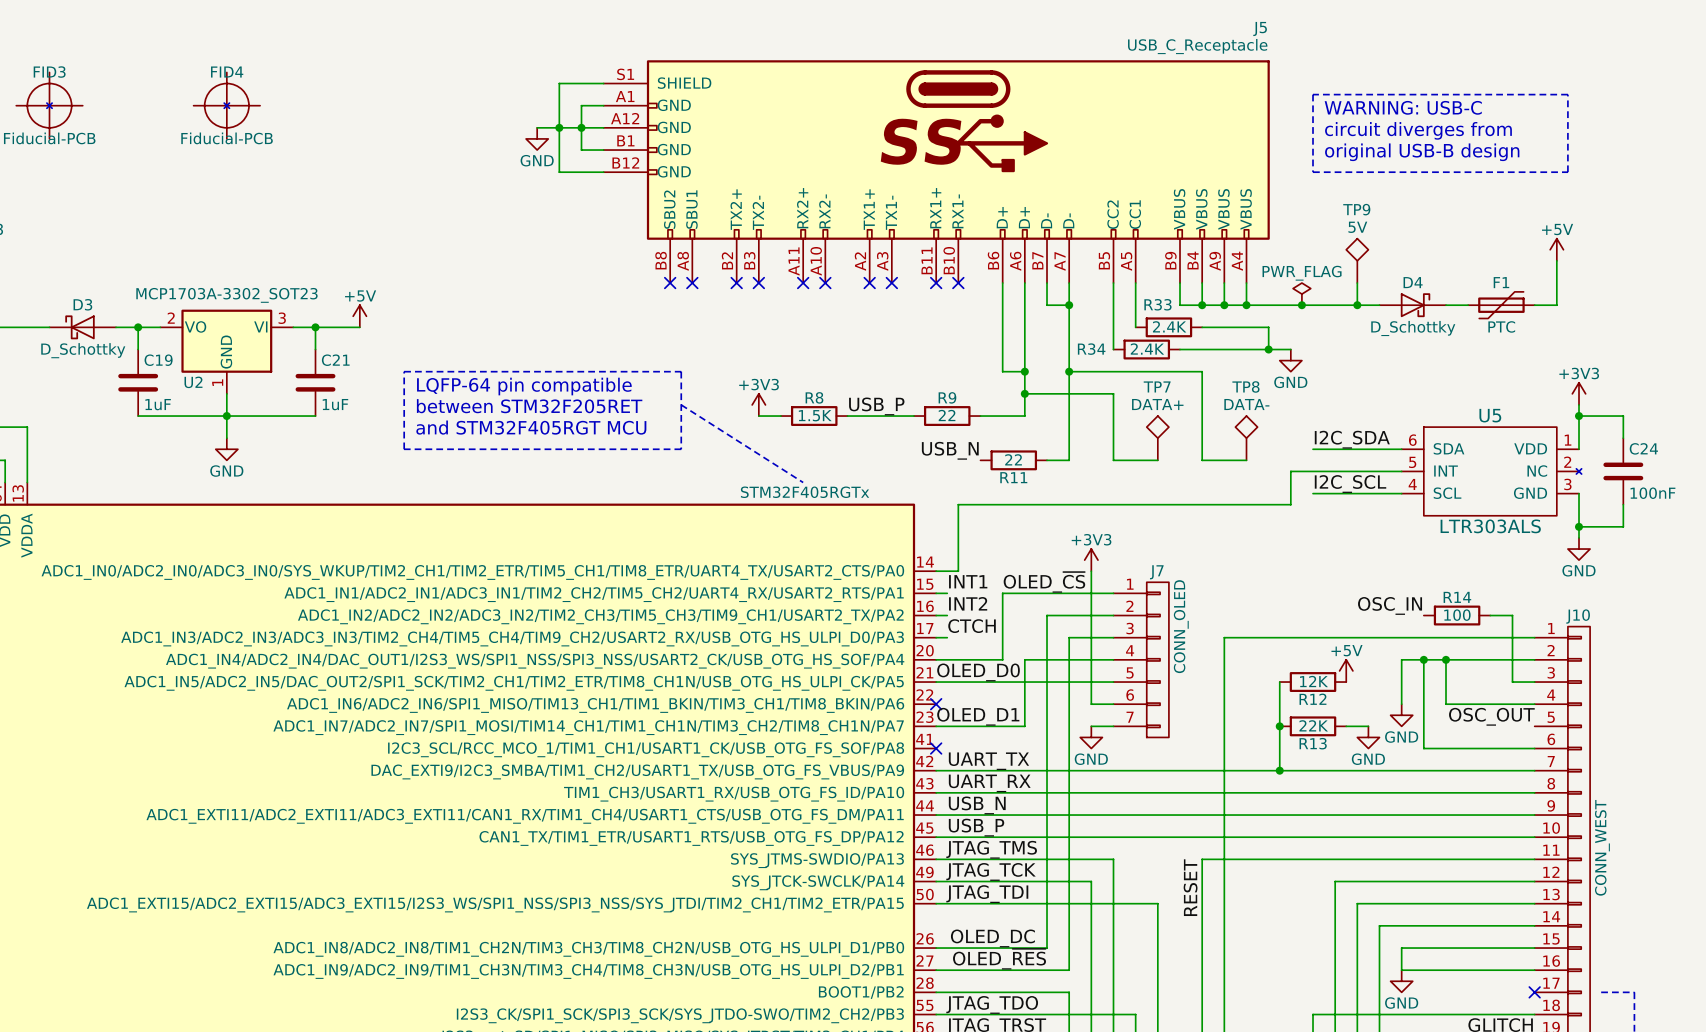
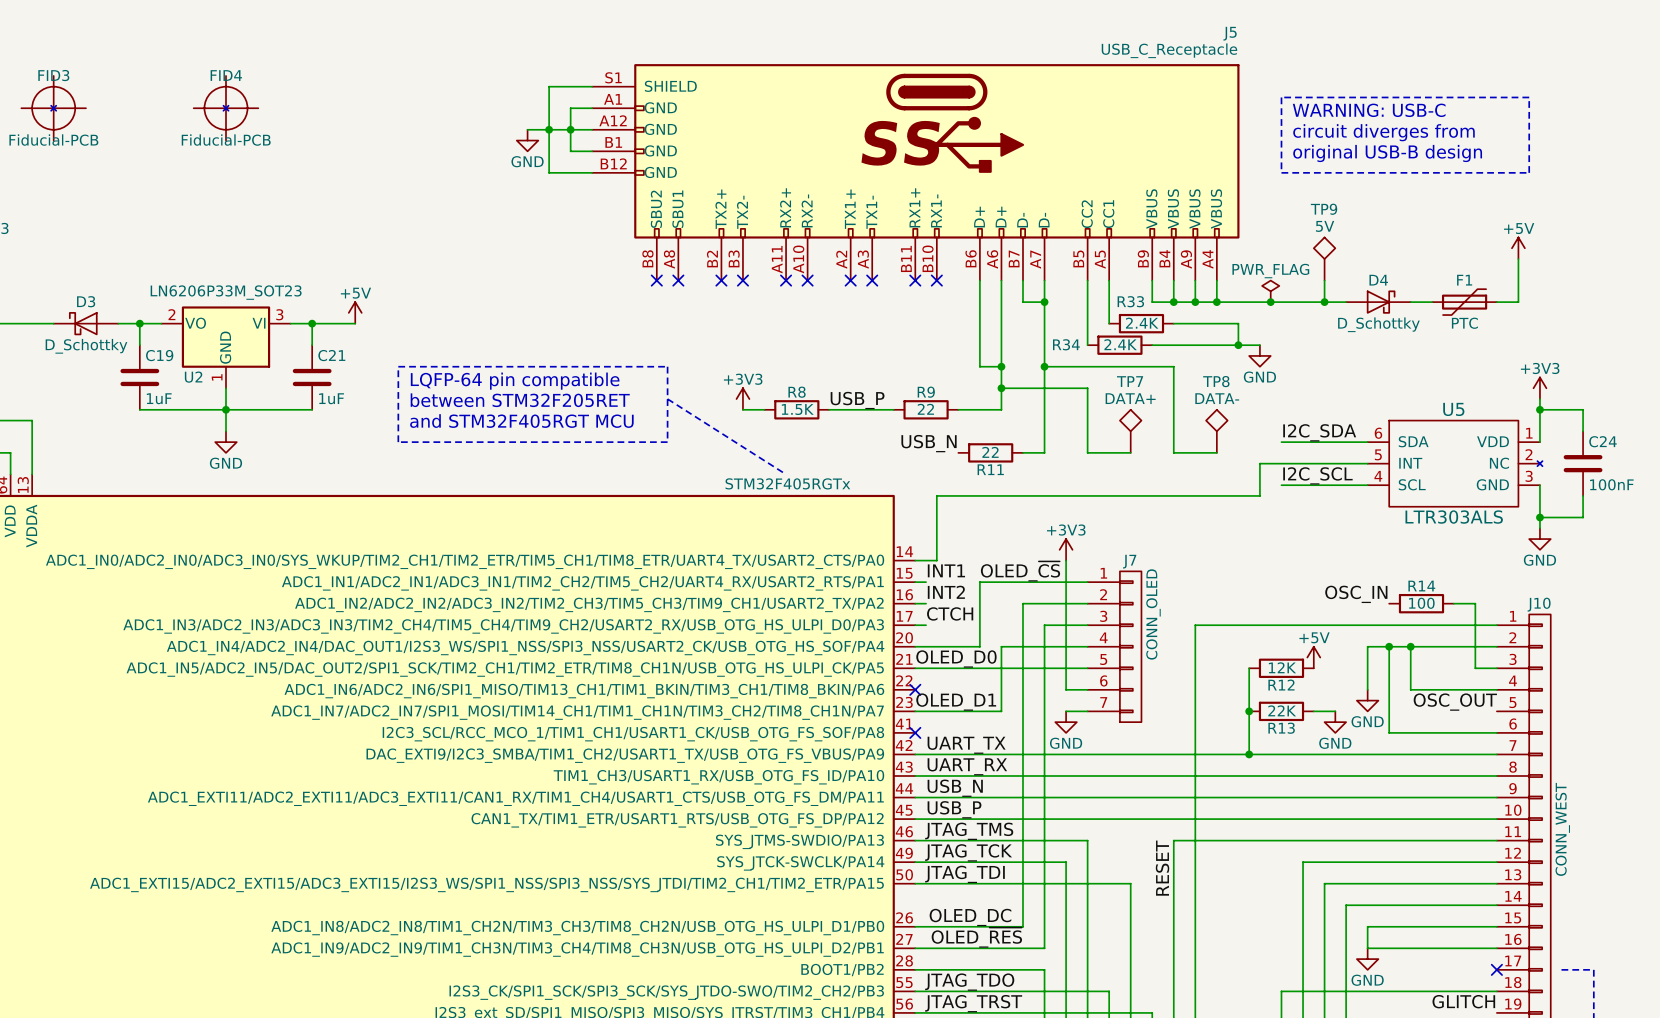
U2 value: MCP1703A-3302_SOT23 (226, 295) -> LN6206P33M_SOT23 (226, 292)

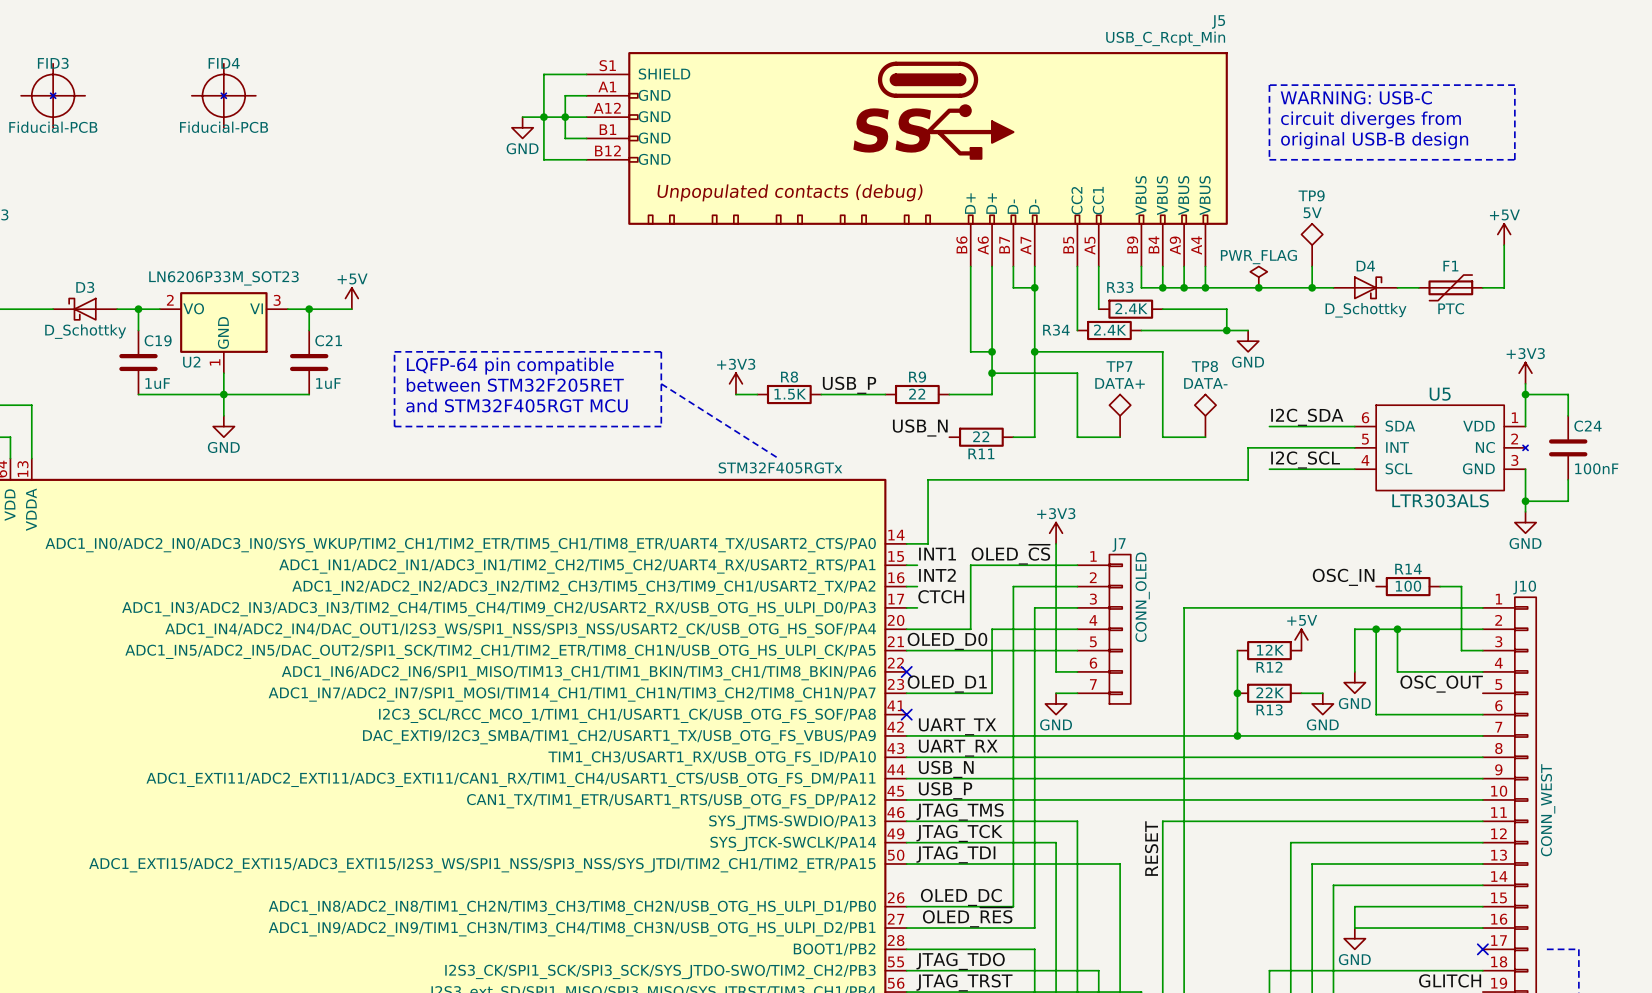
J5 value: USB_C_Receptacle (1169, 50) -> USB_C_Rcpt_Min (1165, 38)
J5 symbol: [592, 64, 1240, 281] -> [586, 52, 1228, 267]
no-connect mark: (656, 280) -> none
no-connect mark: (678, 280) -> none
no-connect mark: (721, 280) -> none
no-connect mark: (742, 280) -> none
no-connect mark: (786, 280) -> none
no-connect mark: (807, 280) -> none
no-connect mark: (850, 280) -> none
no-connect mark: (872, 280) -> none
no-connect mark: (915, 280) -> none
no-connect mark: (936, 280) -> none

